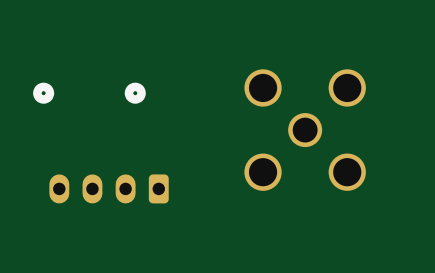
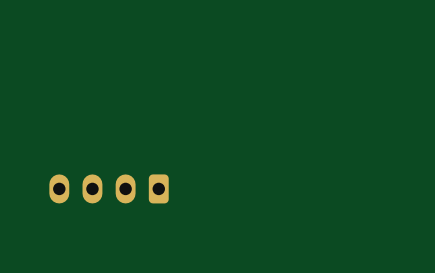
part: (43, 93) -> none
part: (135, 93) -> none
part: (305, 130) -> none

